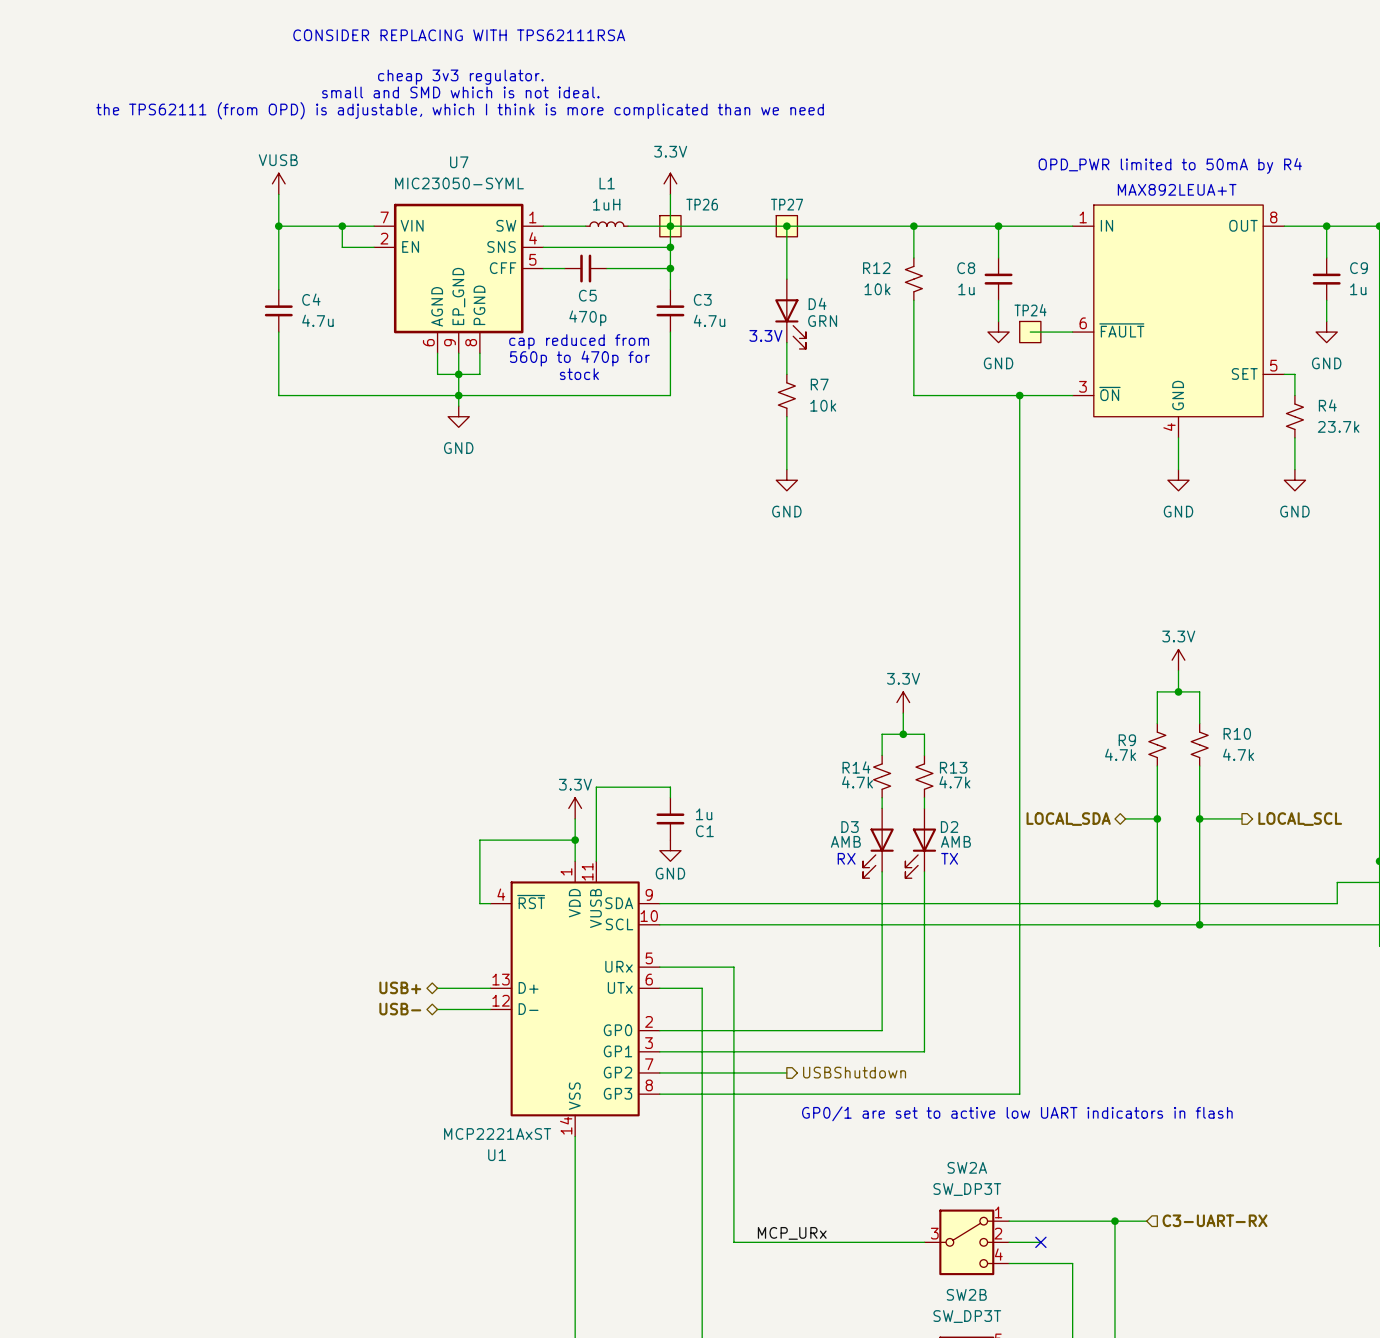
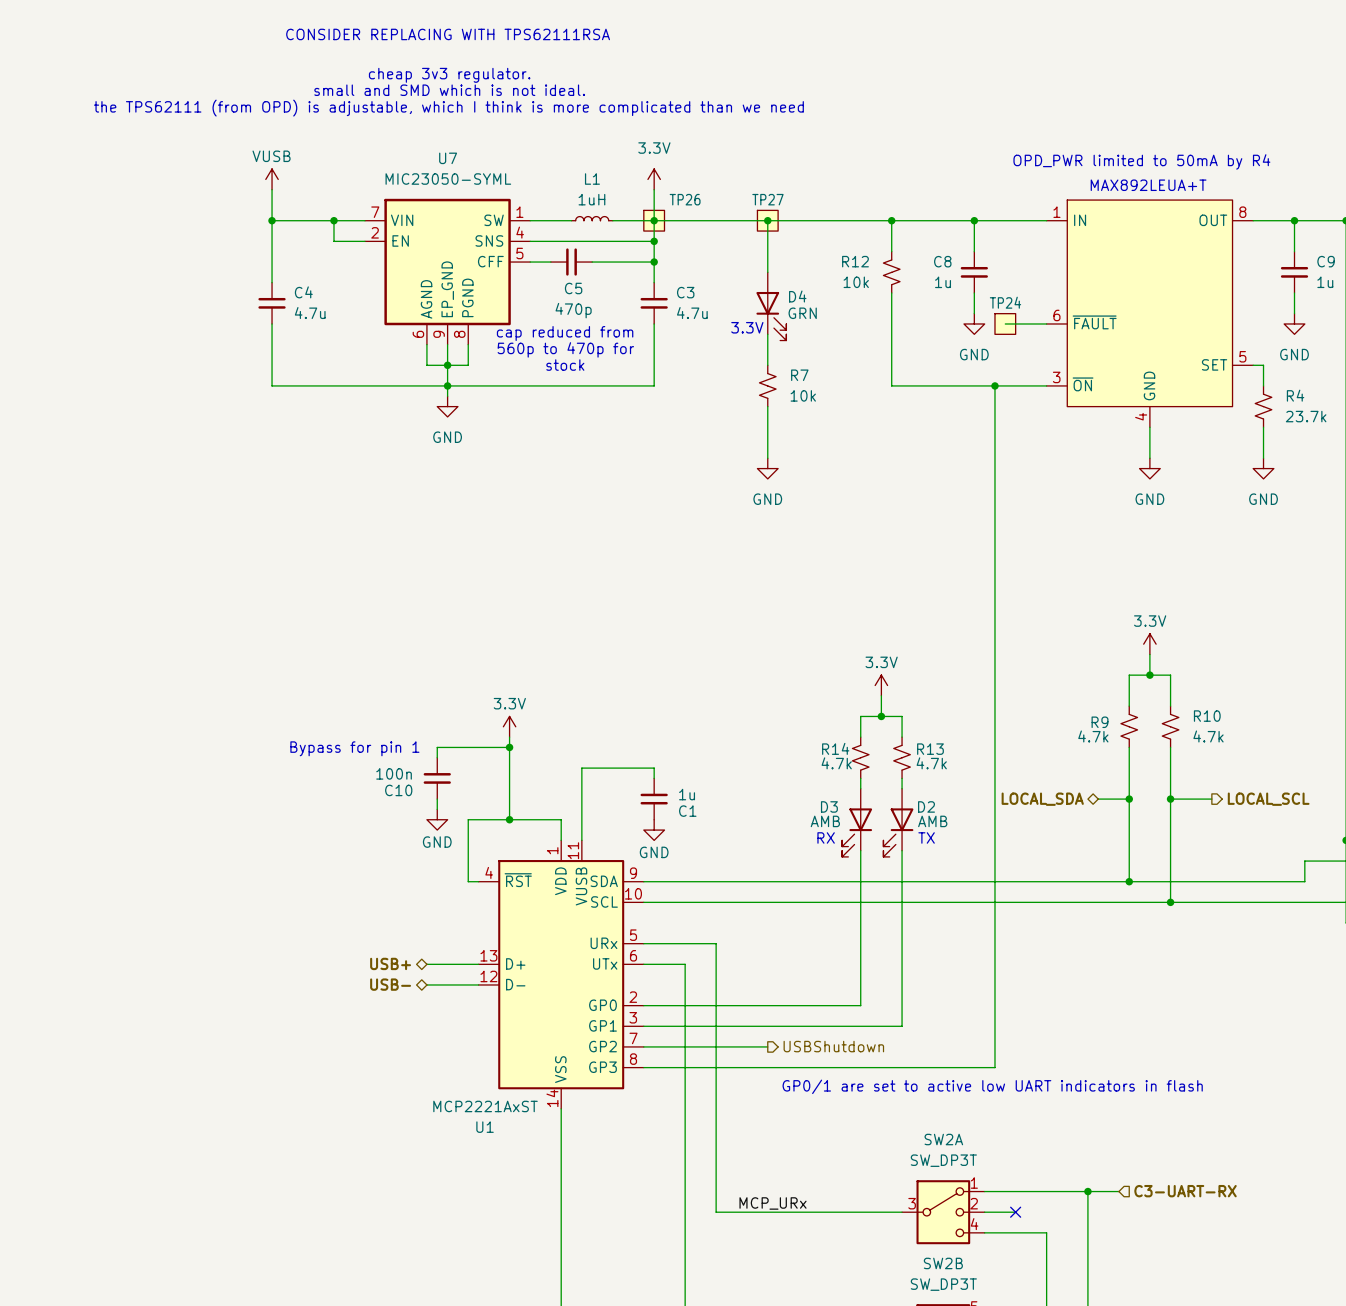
wire: none -> (509, 737) (509, 819)
wire: none -> (509, 747) (437, 747) (437, 757)
junction: none -> (509, 747)
text: none -> Bypass for pin 1 (354, 748)
C10: none -> 100n (437, 778)
power symbol position: 3.3V (575, 808) -> 3.3V (509, 726)
wire: none -> (437, 799) (437, 809)
wire: (575, 818) (575, 840) -> none
power symbol: none -> GND (437, 819)
junction: none -> (509, 819)
junction: (575, 840) -> none

